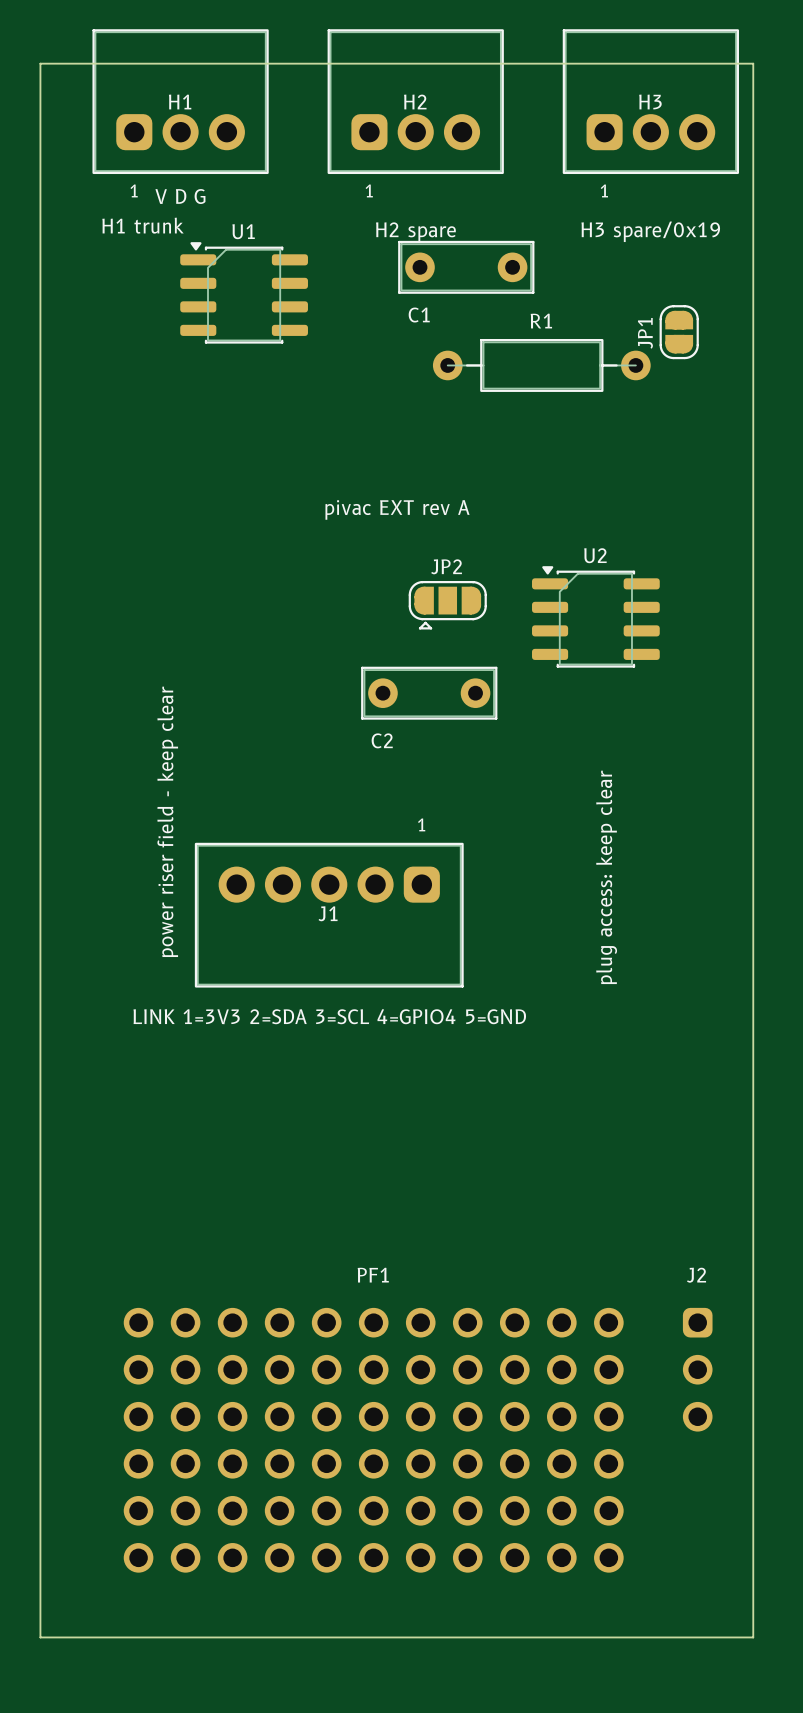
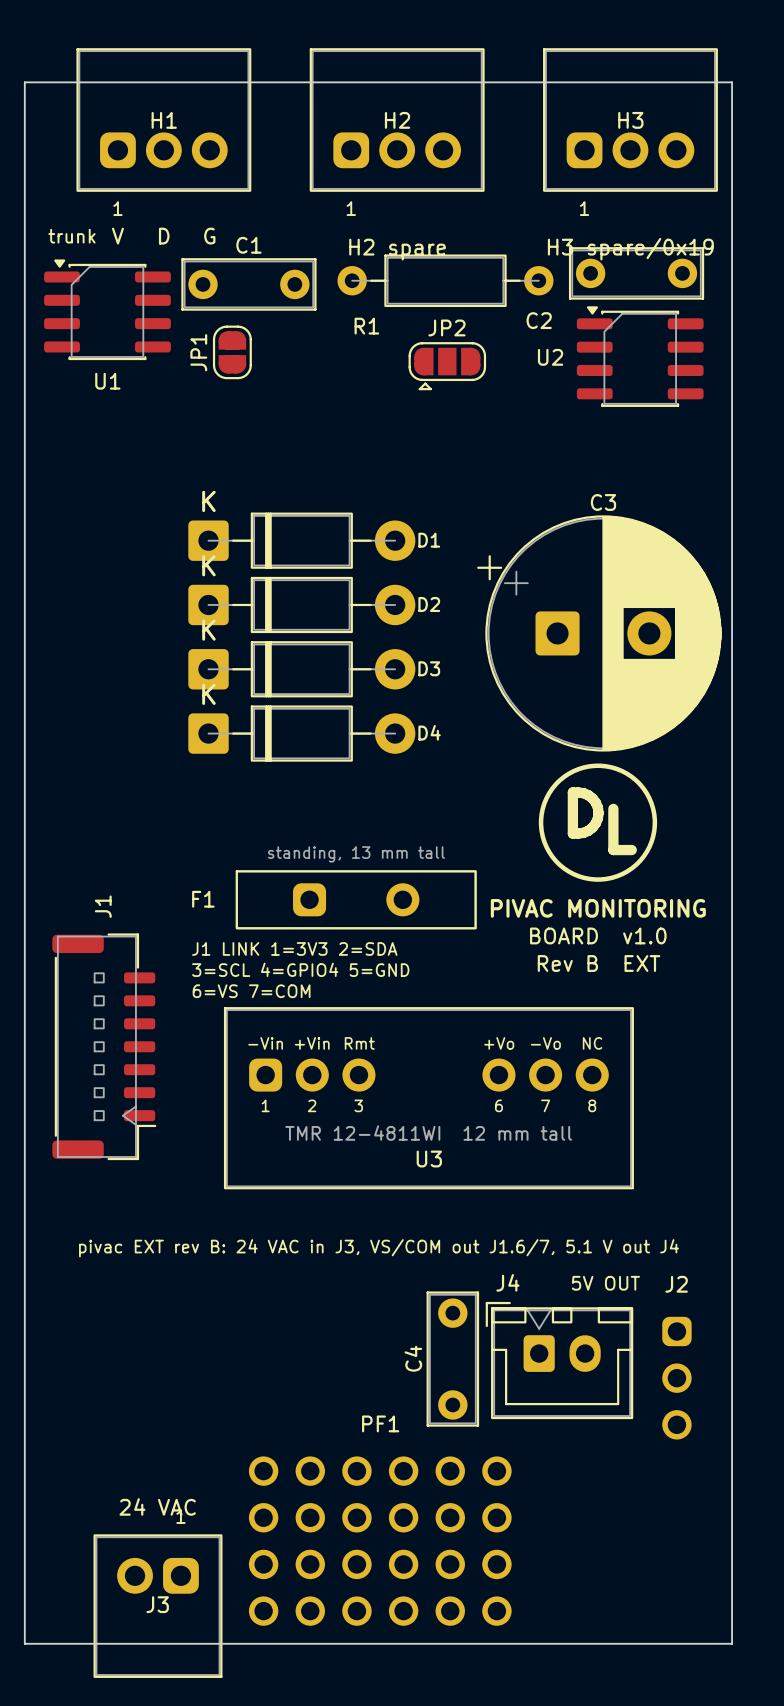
text: V D G (180, 196) -> none
text: none -> trunk (71, 236)
text: none -> D (164, 236)
text: none -> G (209, 236)
text: H1 trunk (143, 225) -> V (117, 236)
U1 name position: U1 (243, 231) -> U1 (107, 381)
C1 position: (466, 267) -> (248, 284)
U1 position: (244, 292) -> (107, 309)
C1 name position: C1 (419, 315) -> C1 (248, 245)
R1 name position: R1 (541, 321) -> R1 (366, 326)
JP1 position: (679, 332) -> (232, 352)
R1 position: (541, 365) -> (445, 280)
text: pivac EXT rev A (397, 509) -> none
D1: none -> (301, 540)
U2 name position: U2 (595, 555) -> U2 (550, 357)
D2: none -> (301, 604)
JP2 position: (447, 605) -> (447, 366)
U2 position: (595, 616) -> (640, 356)
C3: none -> (599, 633)
D3: none -> (301, 669)
C2 position: (429, 693) -> (636, 273)
D4: none -> (301, 733)
C2 name position: C2 (382, 740) -> C2 (539, 320)
drawing: none -> [538, 763, 658, 882]
line: none -> (572, 792) (572, 833) (583, 832) (595, 823) (597, 807) (588, 795) (572, 792)
line: none -> (613, 808) (613, 850) (631, 850)
text: power riser field - keep clear (167, 821) -> none
J1 footprint: [194, 842, 464, 988] -> [52, 933, 157, 1161]
text: plug access: keep clear (606, 877) -> none
F1: none -> (356, 899)
text: none -> PIVAC MONITORING (598, 908)
J1 name position: J1 (328, 913) -> J1 (103, 906)
text: none -> BOARD v1.0 (598, 935)
text: none -> J1 LINK 1=3V3 2=SDA (294, 948)
text: none -> Rev B EXT (599, 963)
text: none -> 3=SCL 4=GPIO4 5=GND (300, 969)
text: none -> 6=VS 7=COM (251, 991)
text: LINK 1=3V3 2=SDA 3=SCL 4=GPIO4 5=GND (329, 1016) -> none
U3: none -> (428, 1098)
text: none -> pivac EXT rev B: 24 VAC in J3, VS/COM out J1.6/7, 5.1 V out J4 (379, 1248)
text: none -> 5V OUT (605, 1283)
PF1 name position: PF1 (373, 1275) -> PF1 (380, 1423)
PF1 footprint: [123, 1307, 624, 1573] -> [248, 1456, 512, 1626]
C4: none -> (452, 1359)
J4: none -> (559, 1360)
text: none -> 24 VAC (157, 1506)
J3: none -> (158, 1606)

